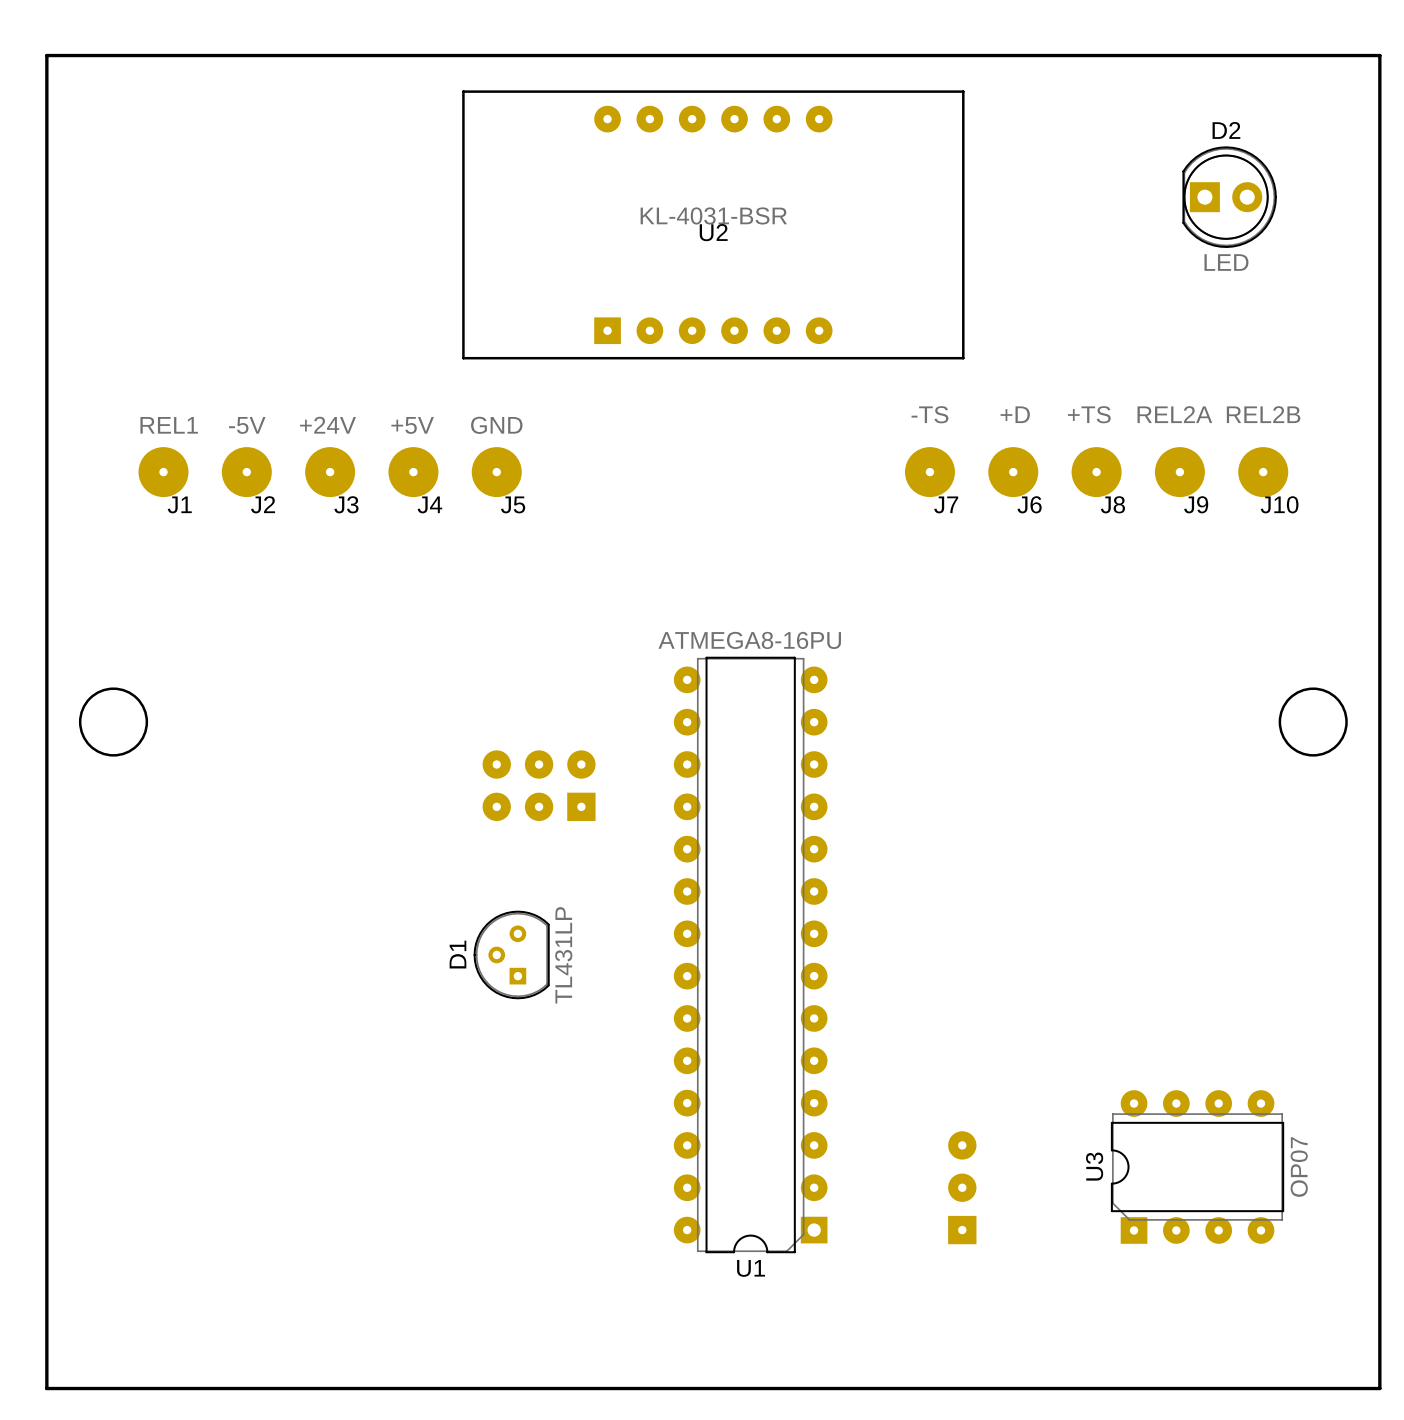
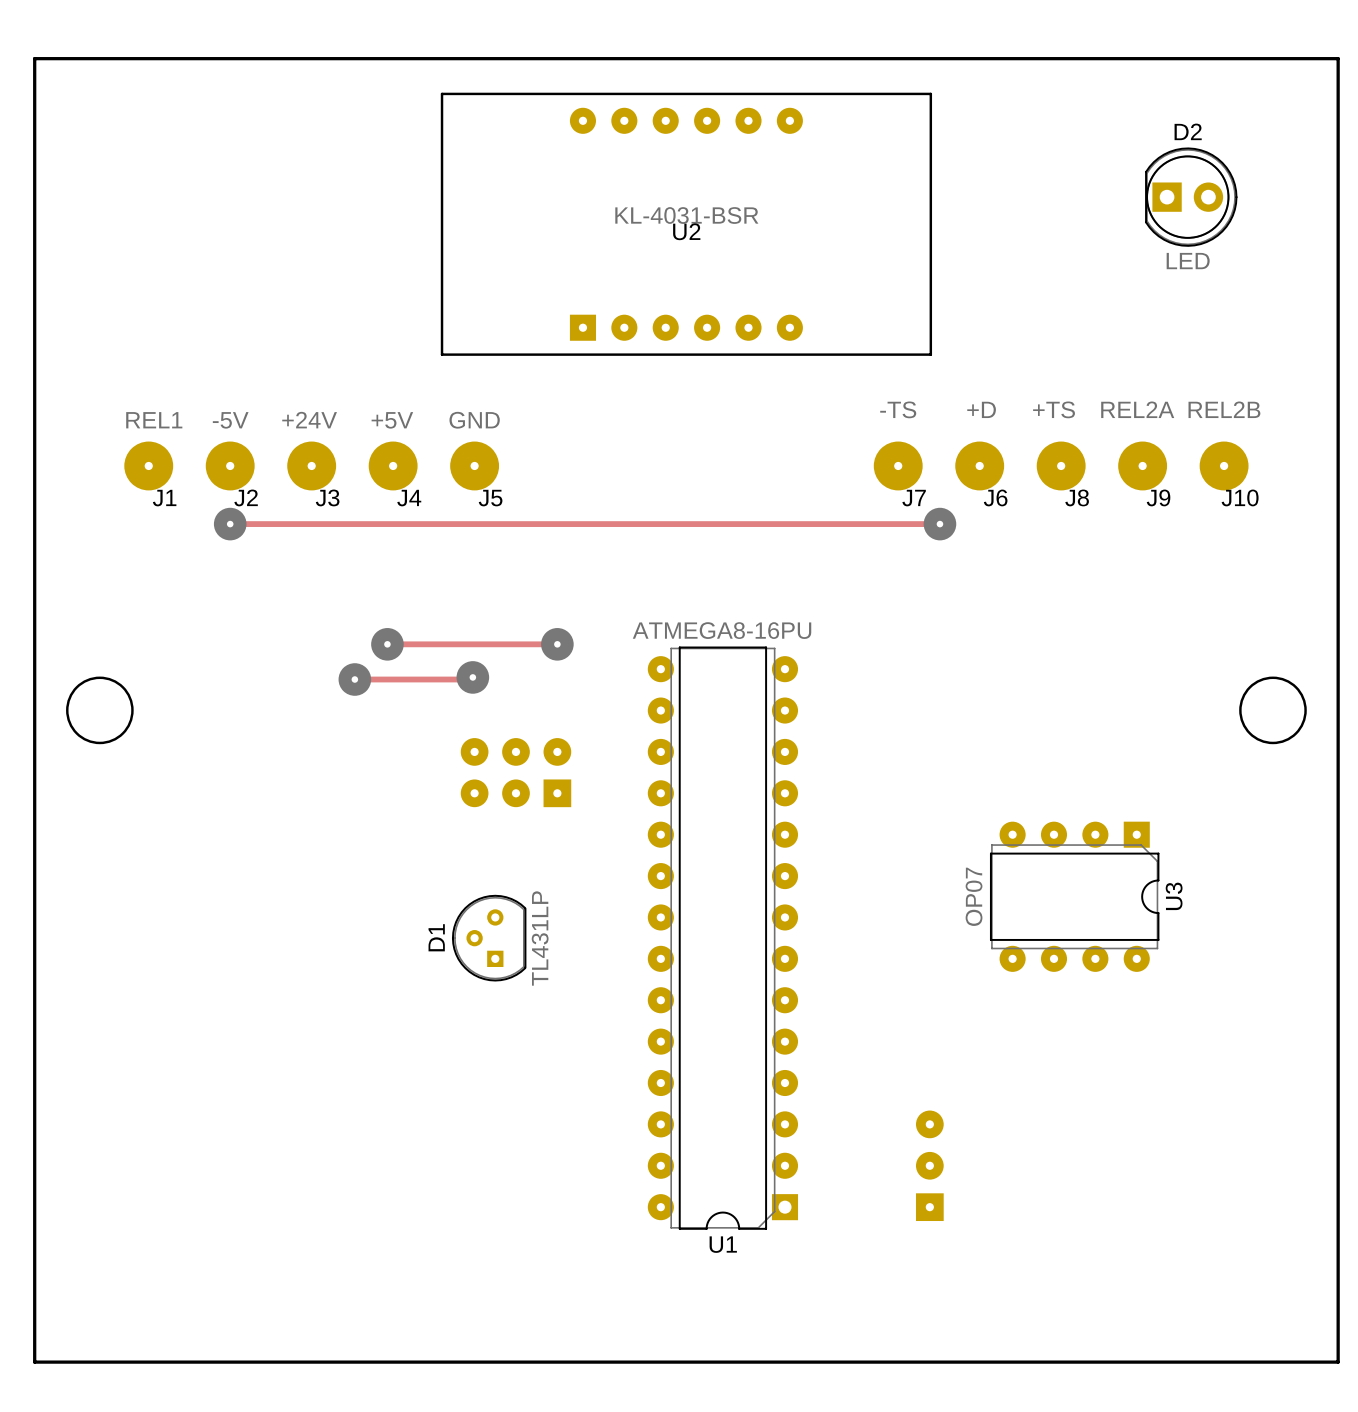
track: none -> (230, 524) (939, 524)
via: none -> (230, 524)
via: none -> (939, 524)
track: none -> (387, 644) (557, 644)
via: none -> (387, 644)
via: none -> (557, 644)
track: none -> (472, 677) (470, 679) (354, 679)
via: none -> (472, 677)
via: none -> (354, 679)
U3 rotation: 0° (1197, 1167) -> 180° (1074, 896)
U3 position: (1197, 1167) -> (1074, 896)

